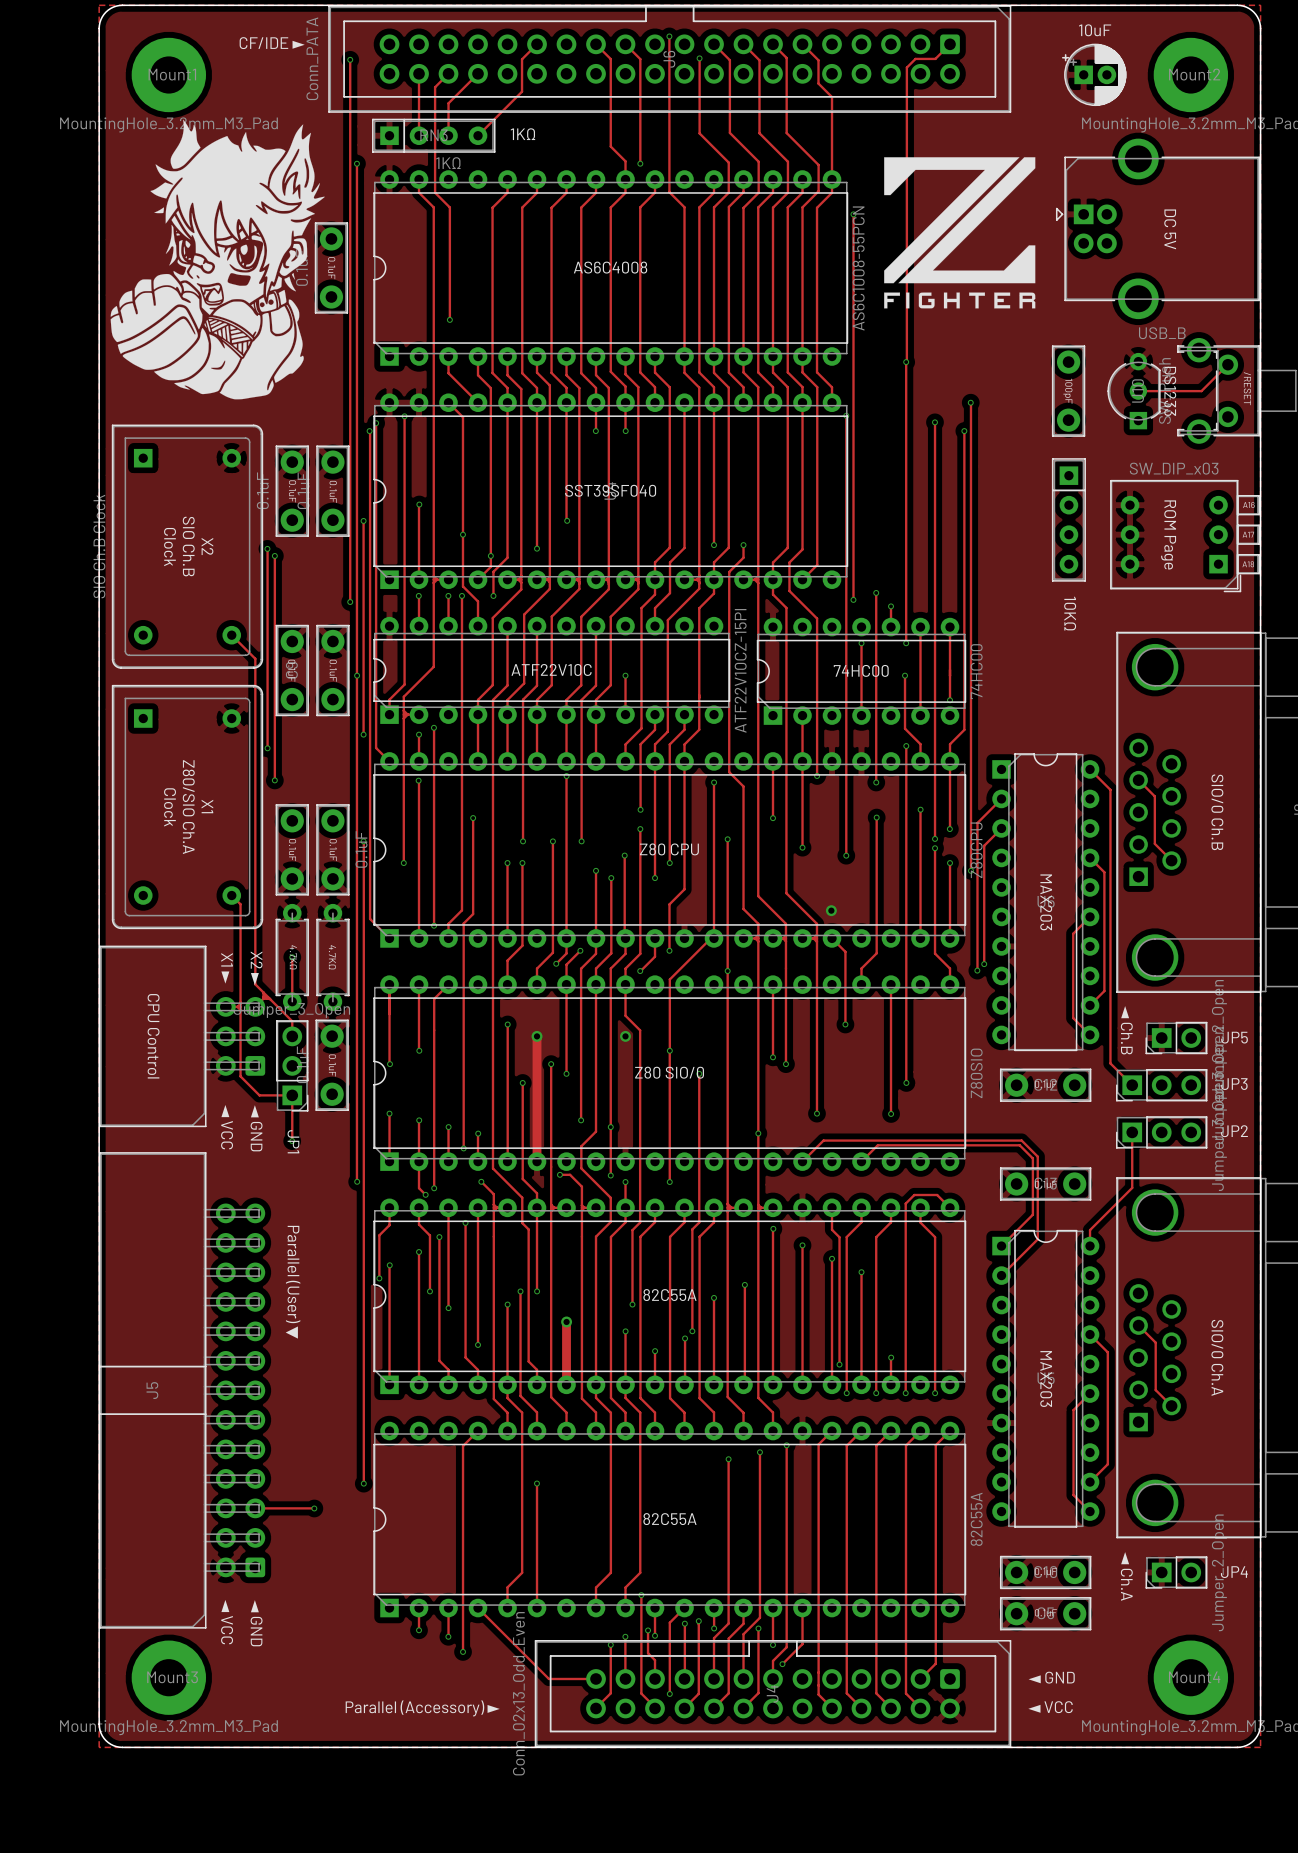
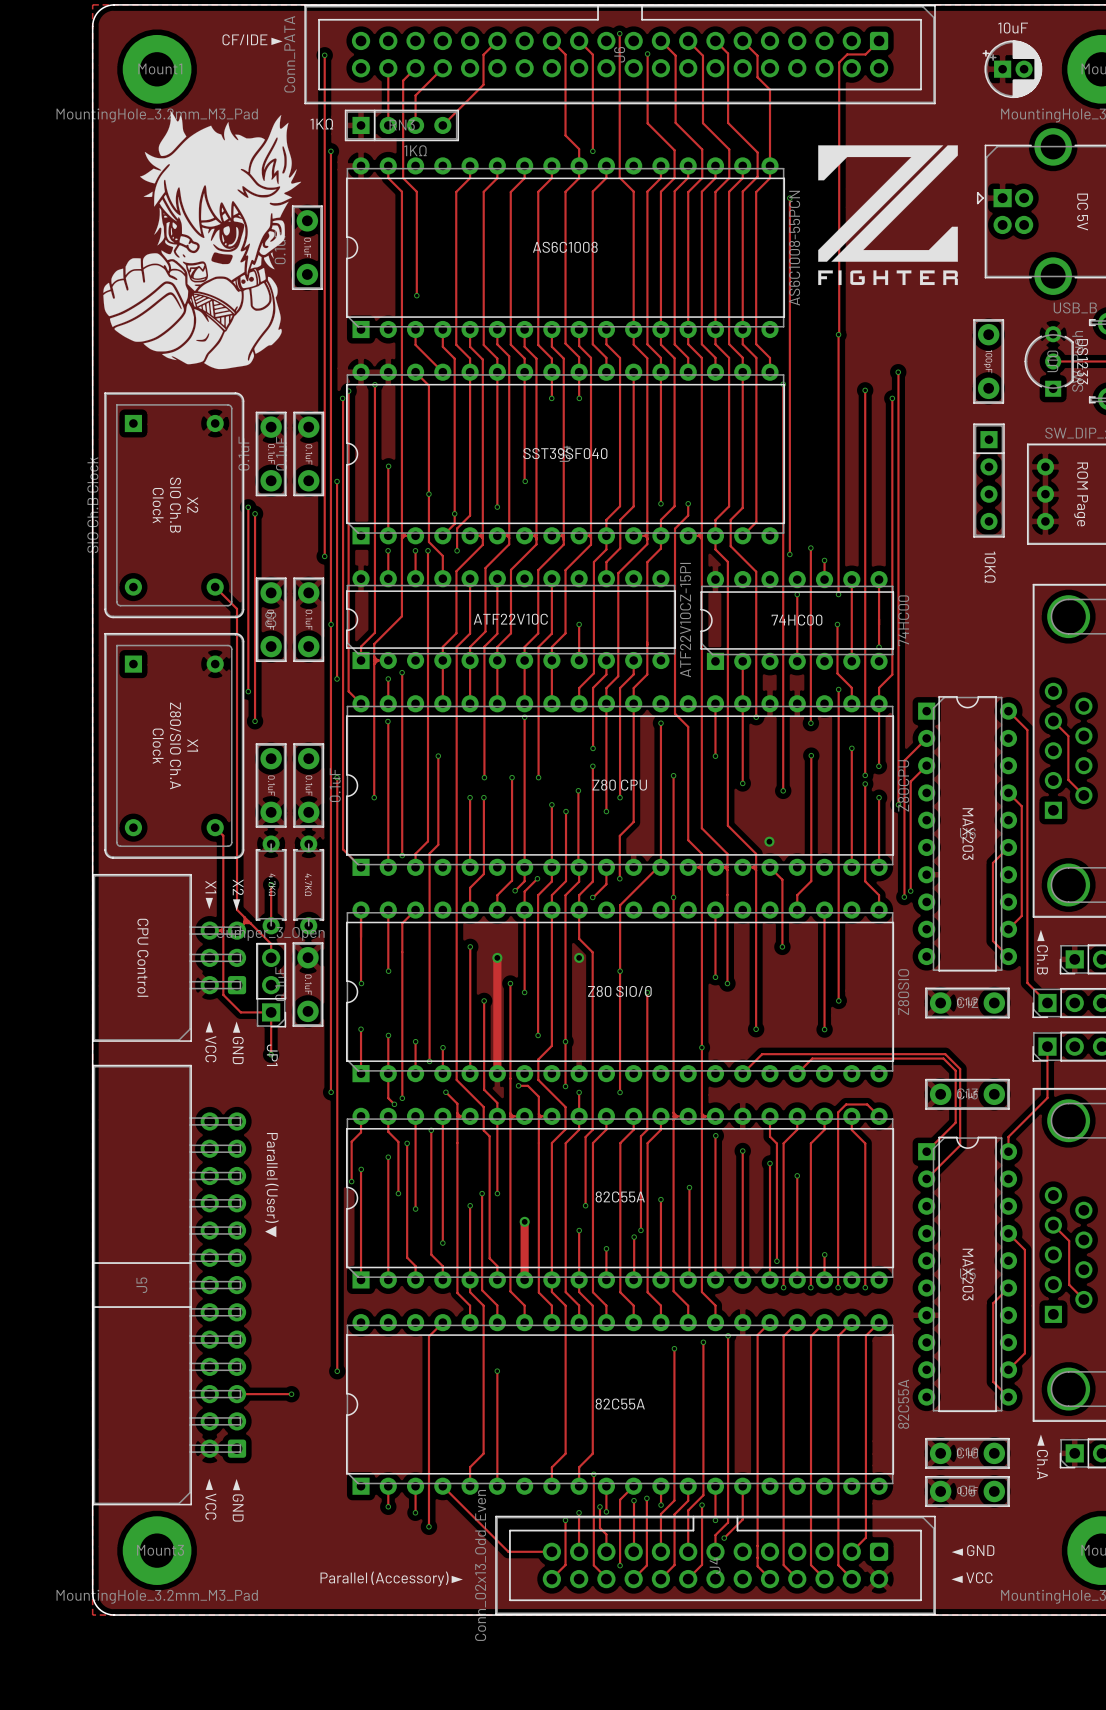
text position: 1KΩ (522, 134) -> 1KΩ (321, 124)
part text: AS6C4008 (610, 267) -> AS6C1008 (565, 247)

